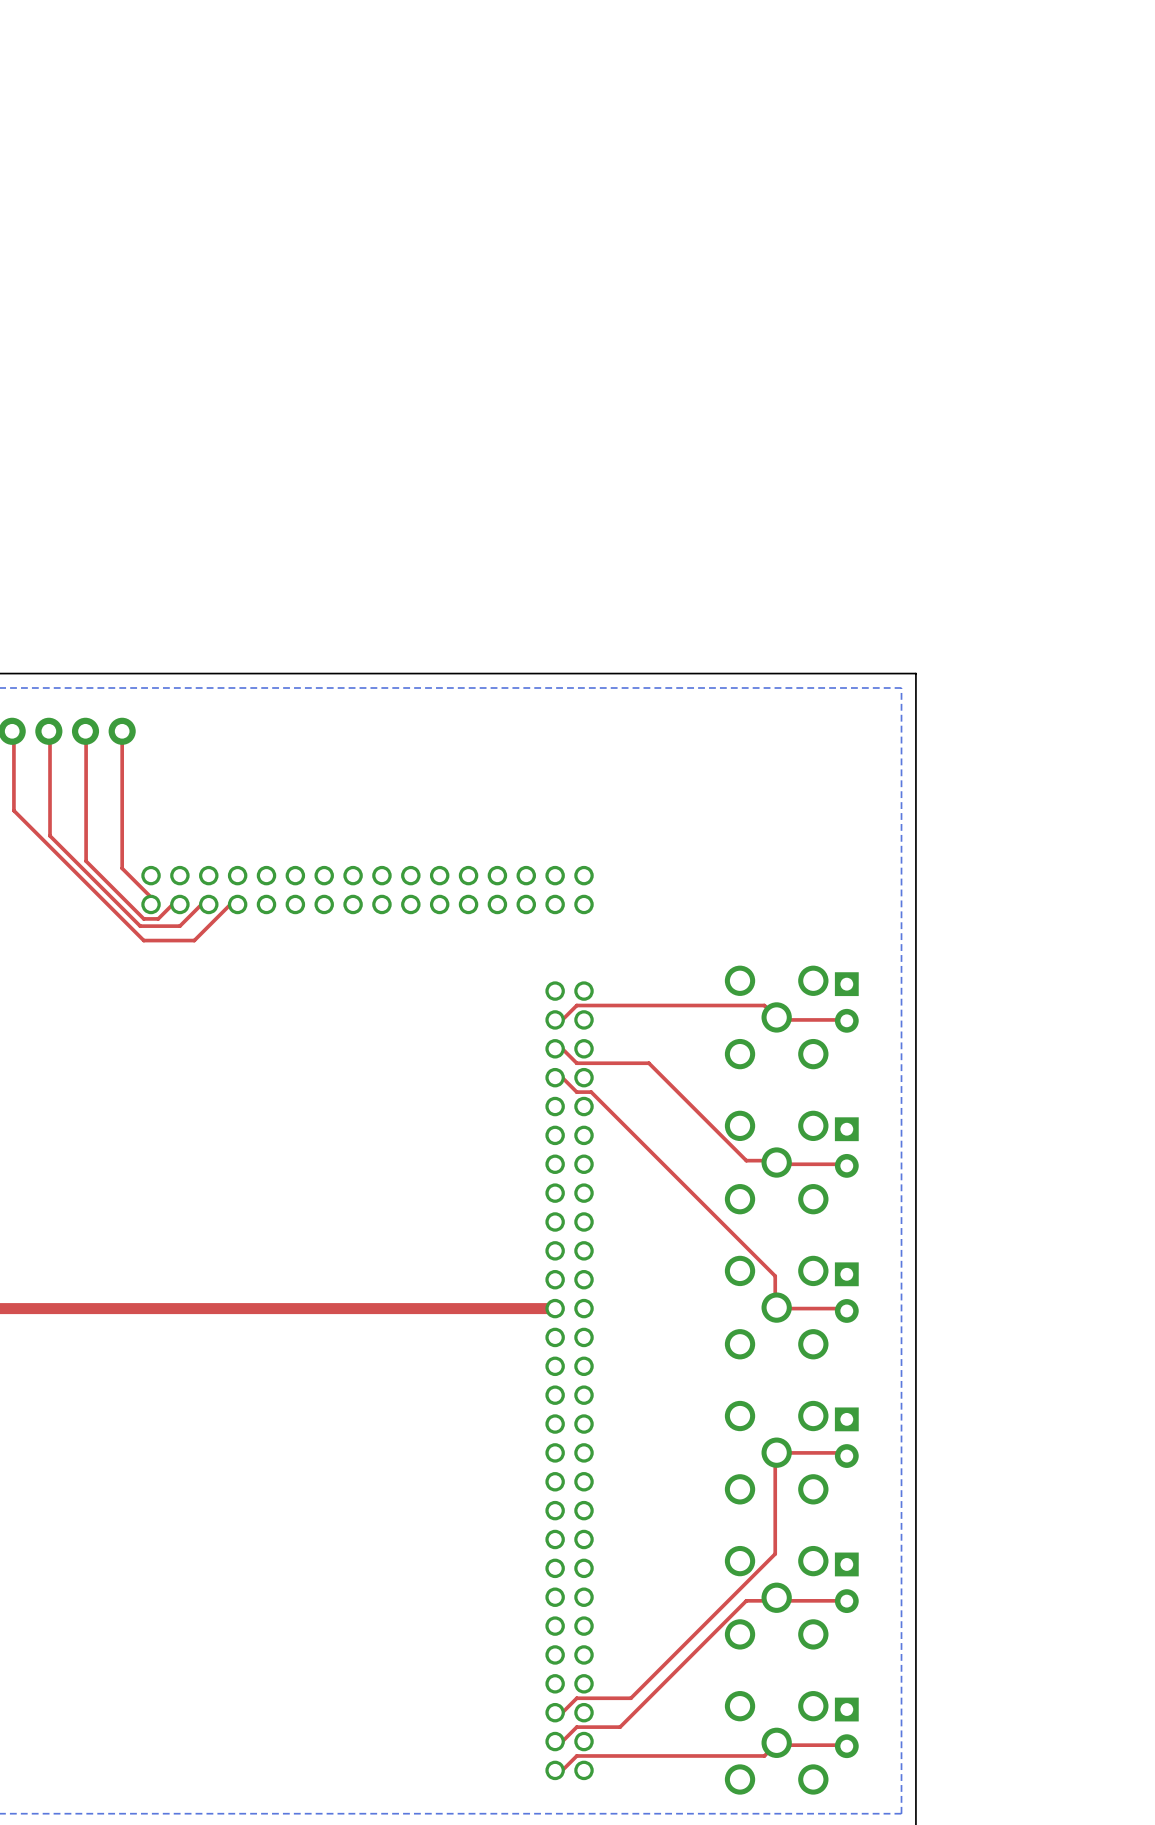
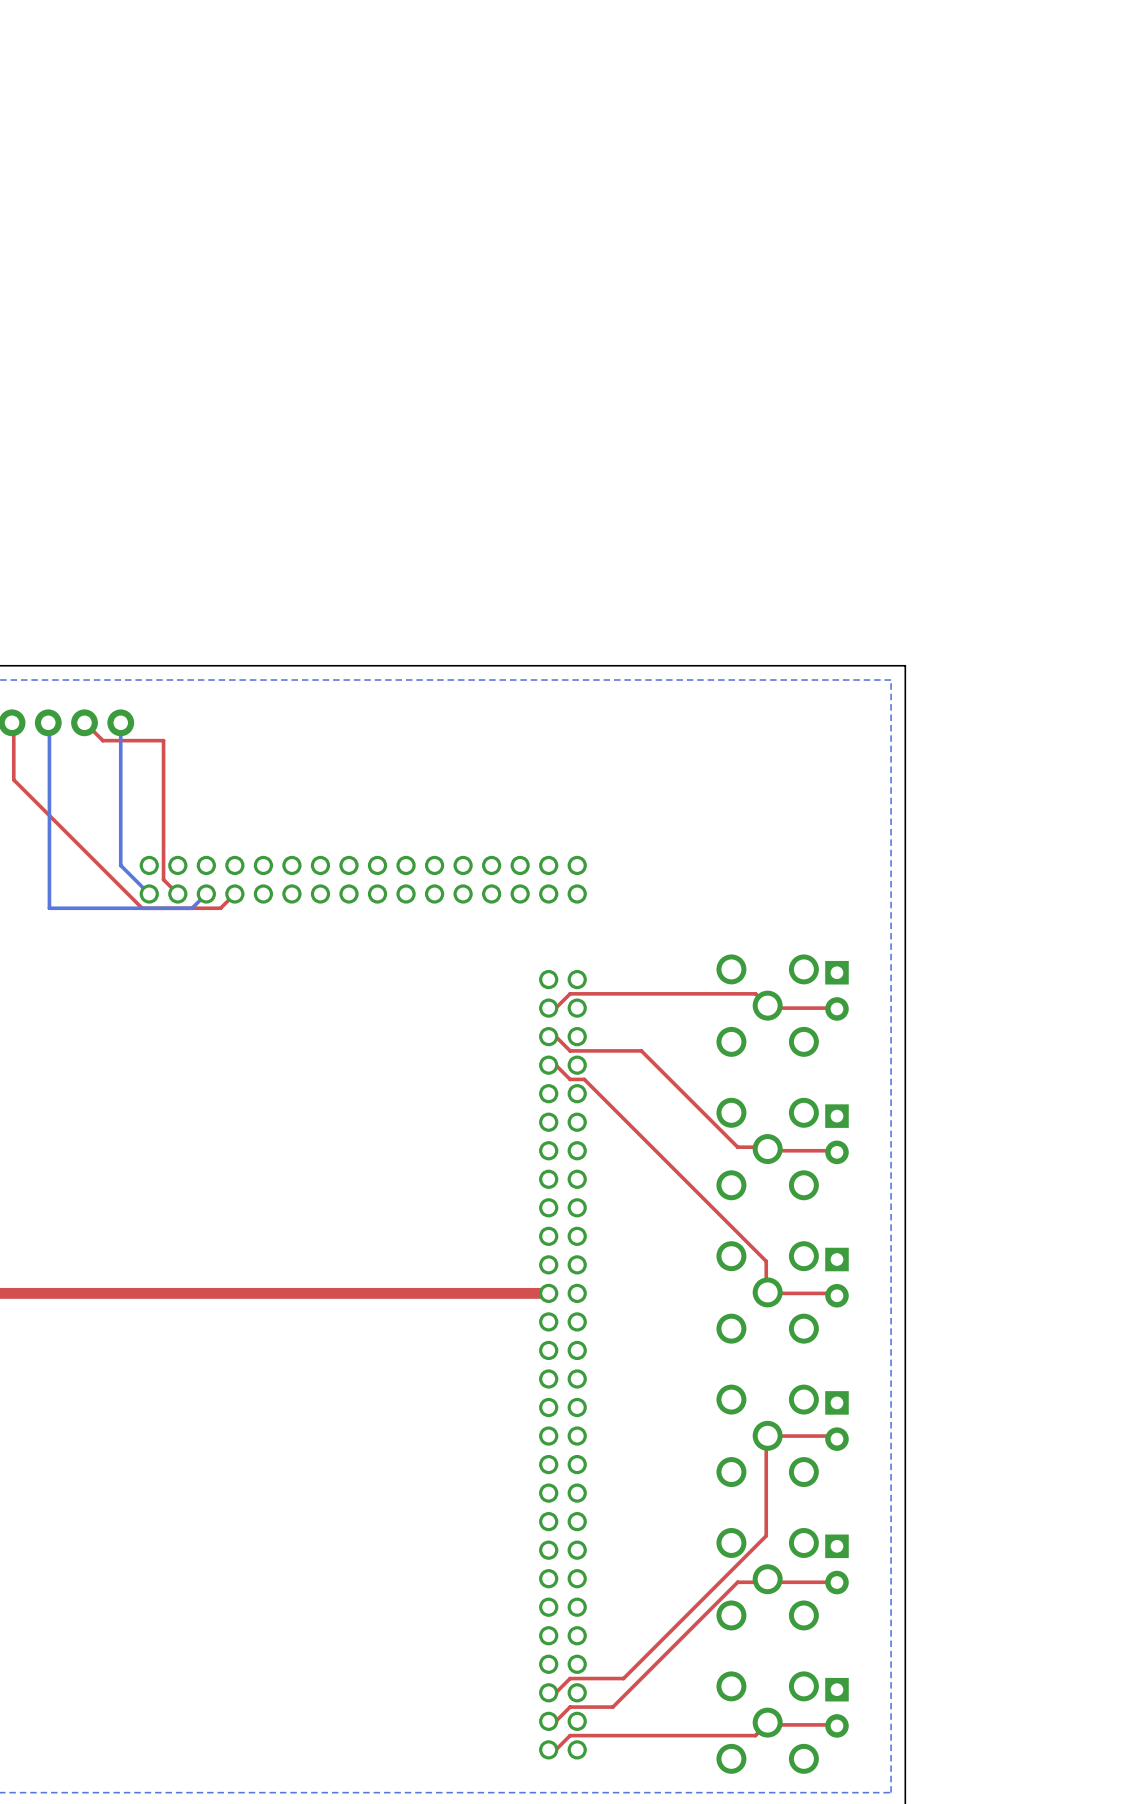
top track: (48, 731) (50, 835) (140, 926) (179, 926) (201, 904) (208, 904) -> none
bottom track: none -> (48, 722) (49, 908) (192, 908) (206, 893)
top track: (86, 731) (86, 861) -> (13, 779) (85, 851)
top track: none -> (85, 722) (102, 740) (163, 740) (163, 879) (177, 893)
top track: (122, 731) (122, 868) (151, 897) (151, 904) -> none
bottom track: none -> (120, 722) (120, 865) (149, 893)
top track: (13, 789) (13, 810) (143, 940) (194, 940) (230, 904) (237, 904) -> none
top track: (179, 904) (172, 904) (158, 918) -> (234, 893) (220, 908) (156, 908)

